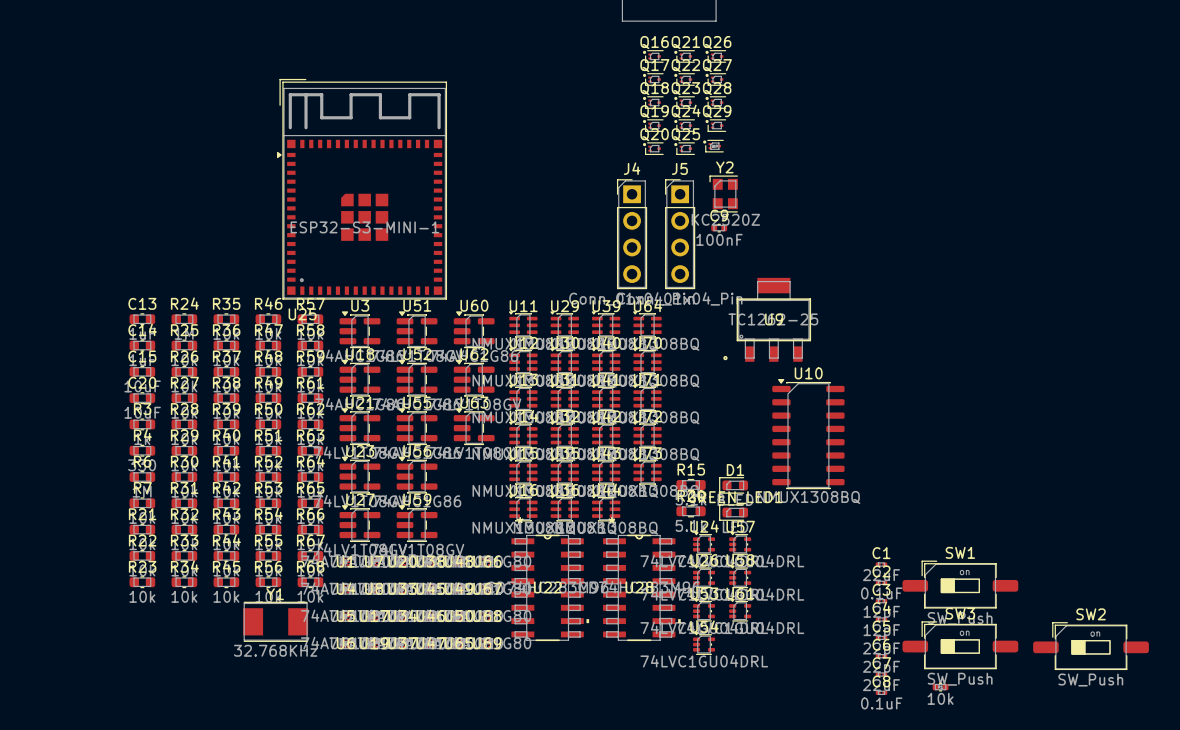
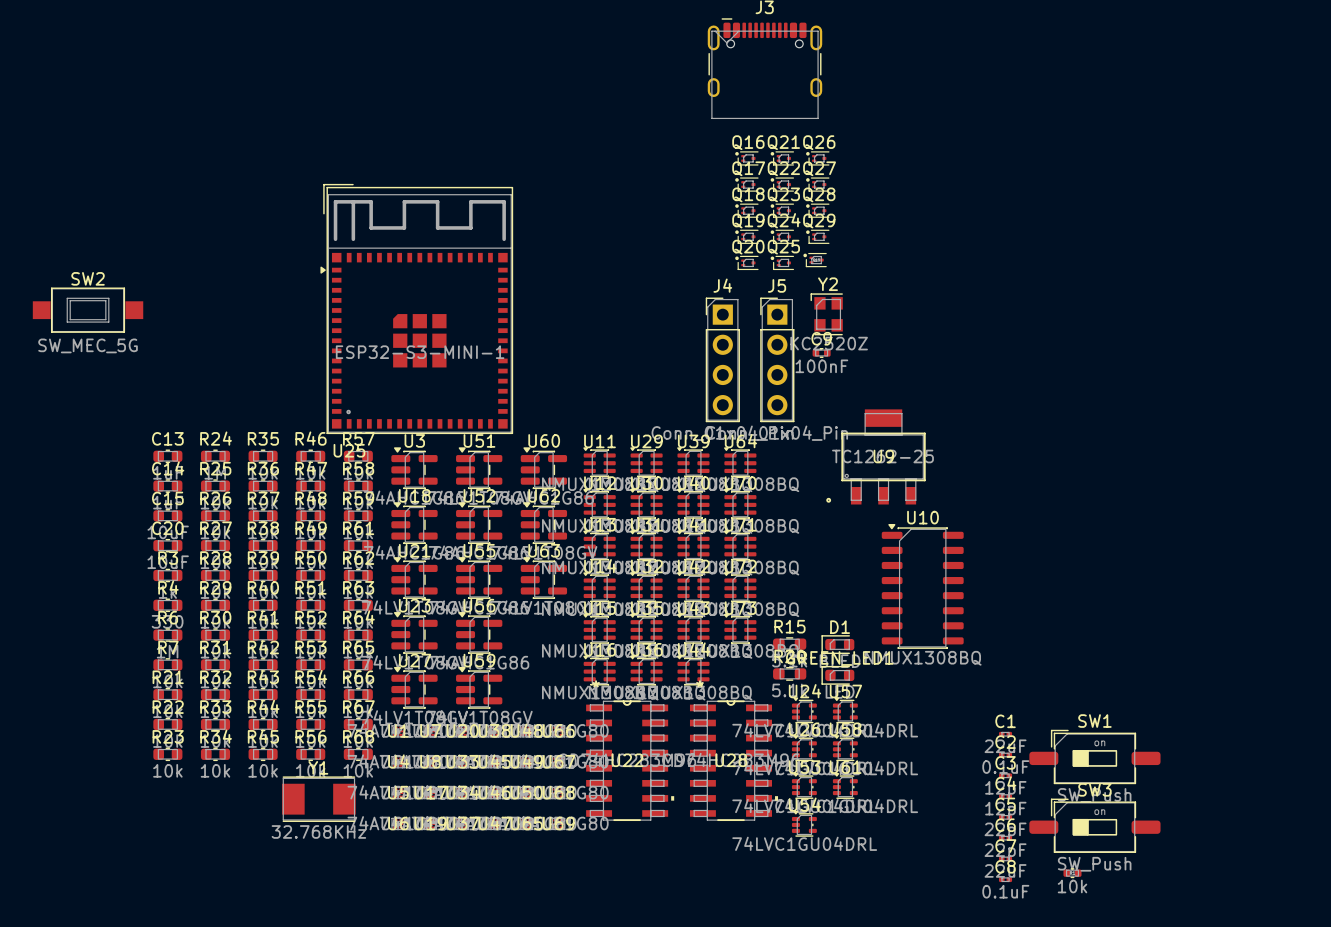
SW2 footprint: [1033, 622, 1149, 671] -> [32, 287, 144, 333]
SW2 value: SW_Push (1090, 680) -> SW_MEC_5G (88, 345)

